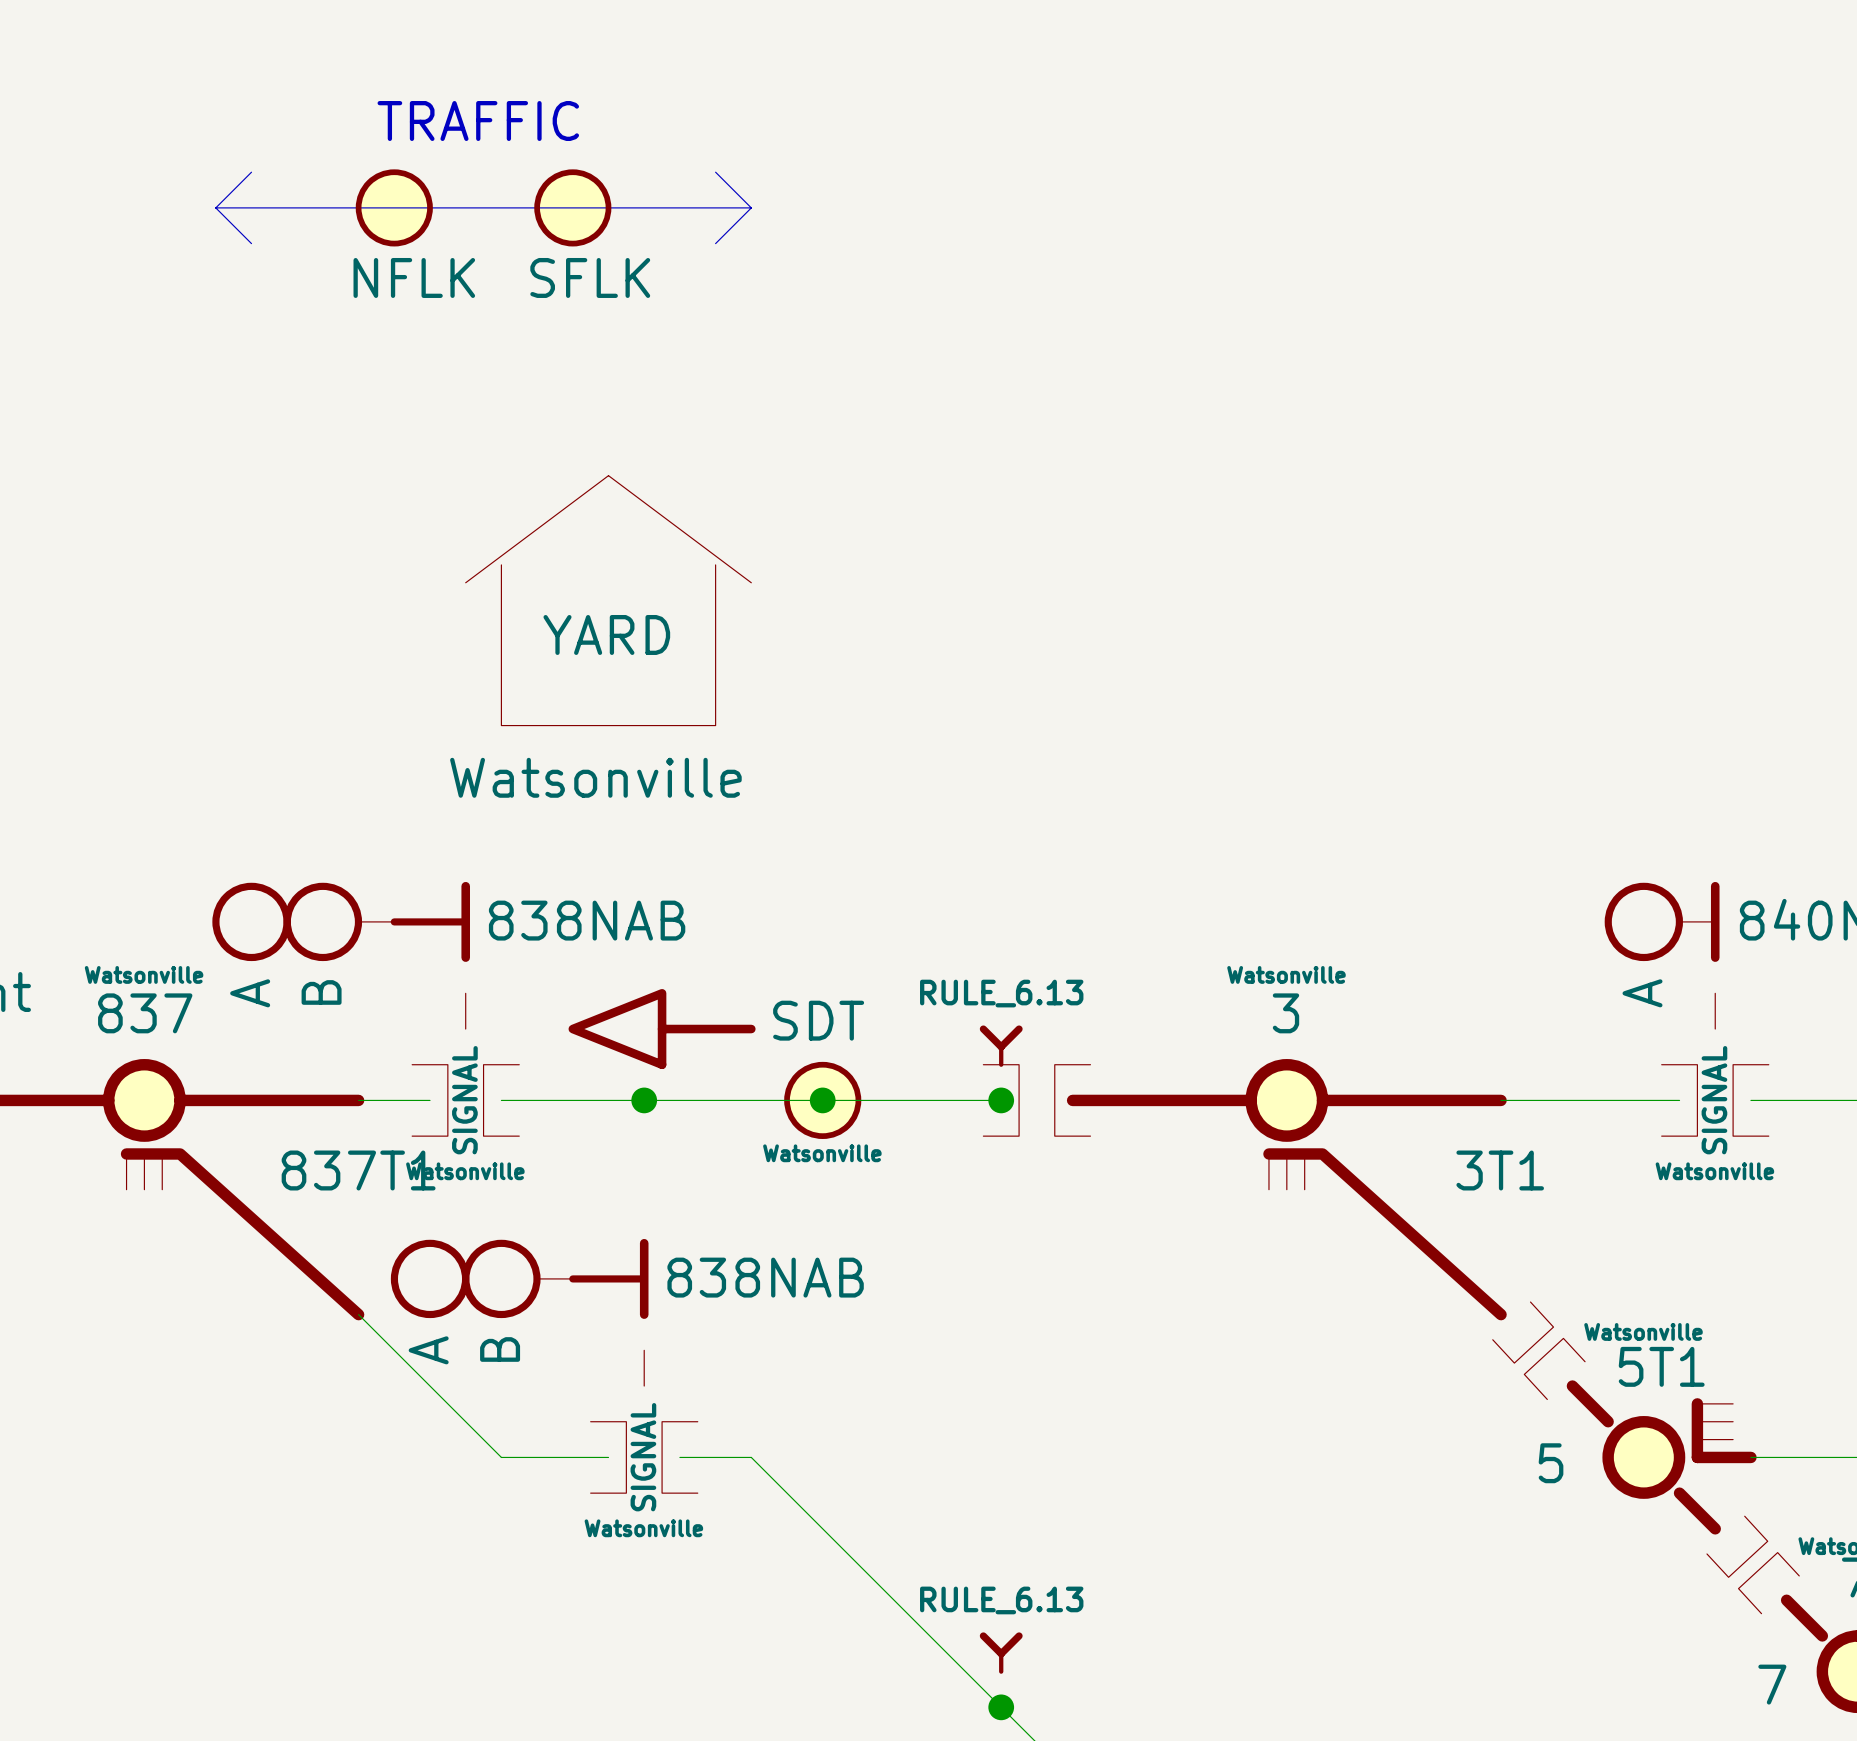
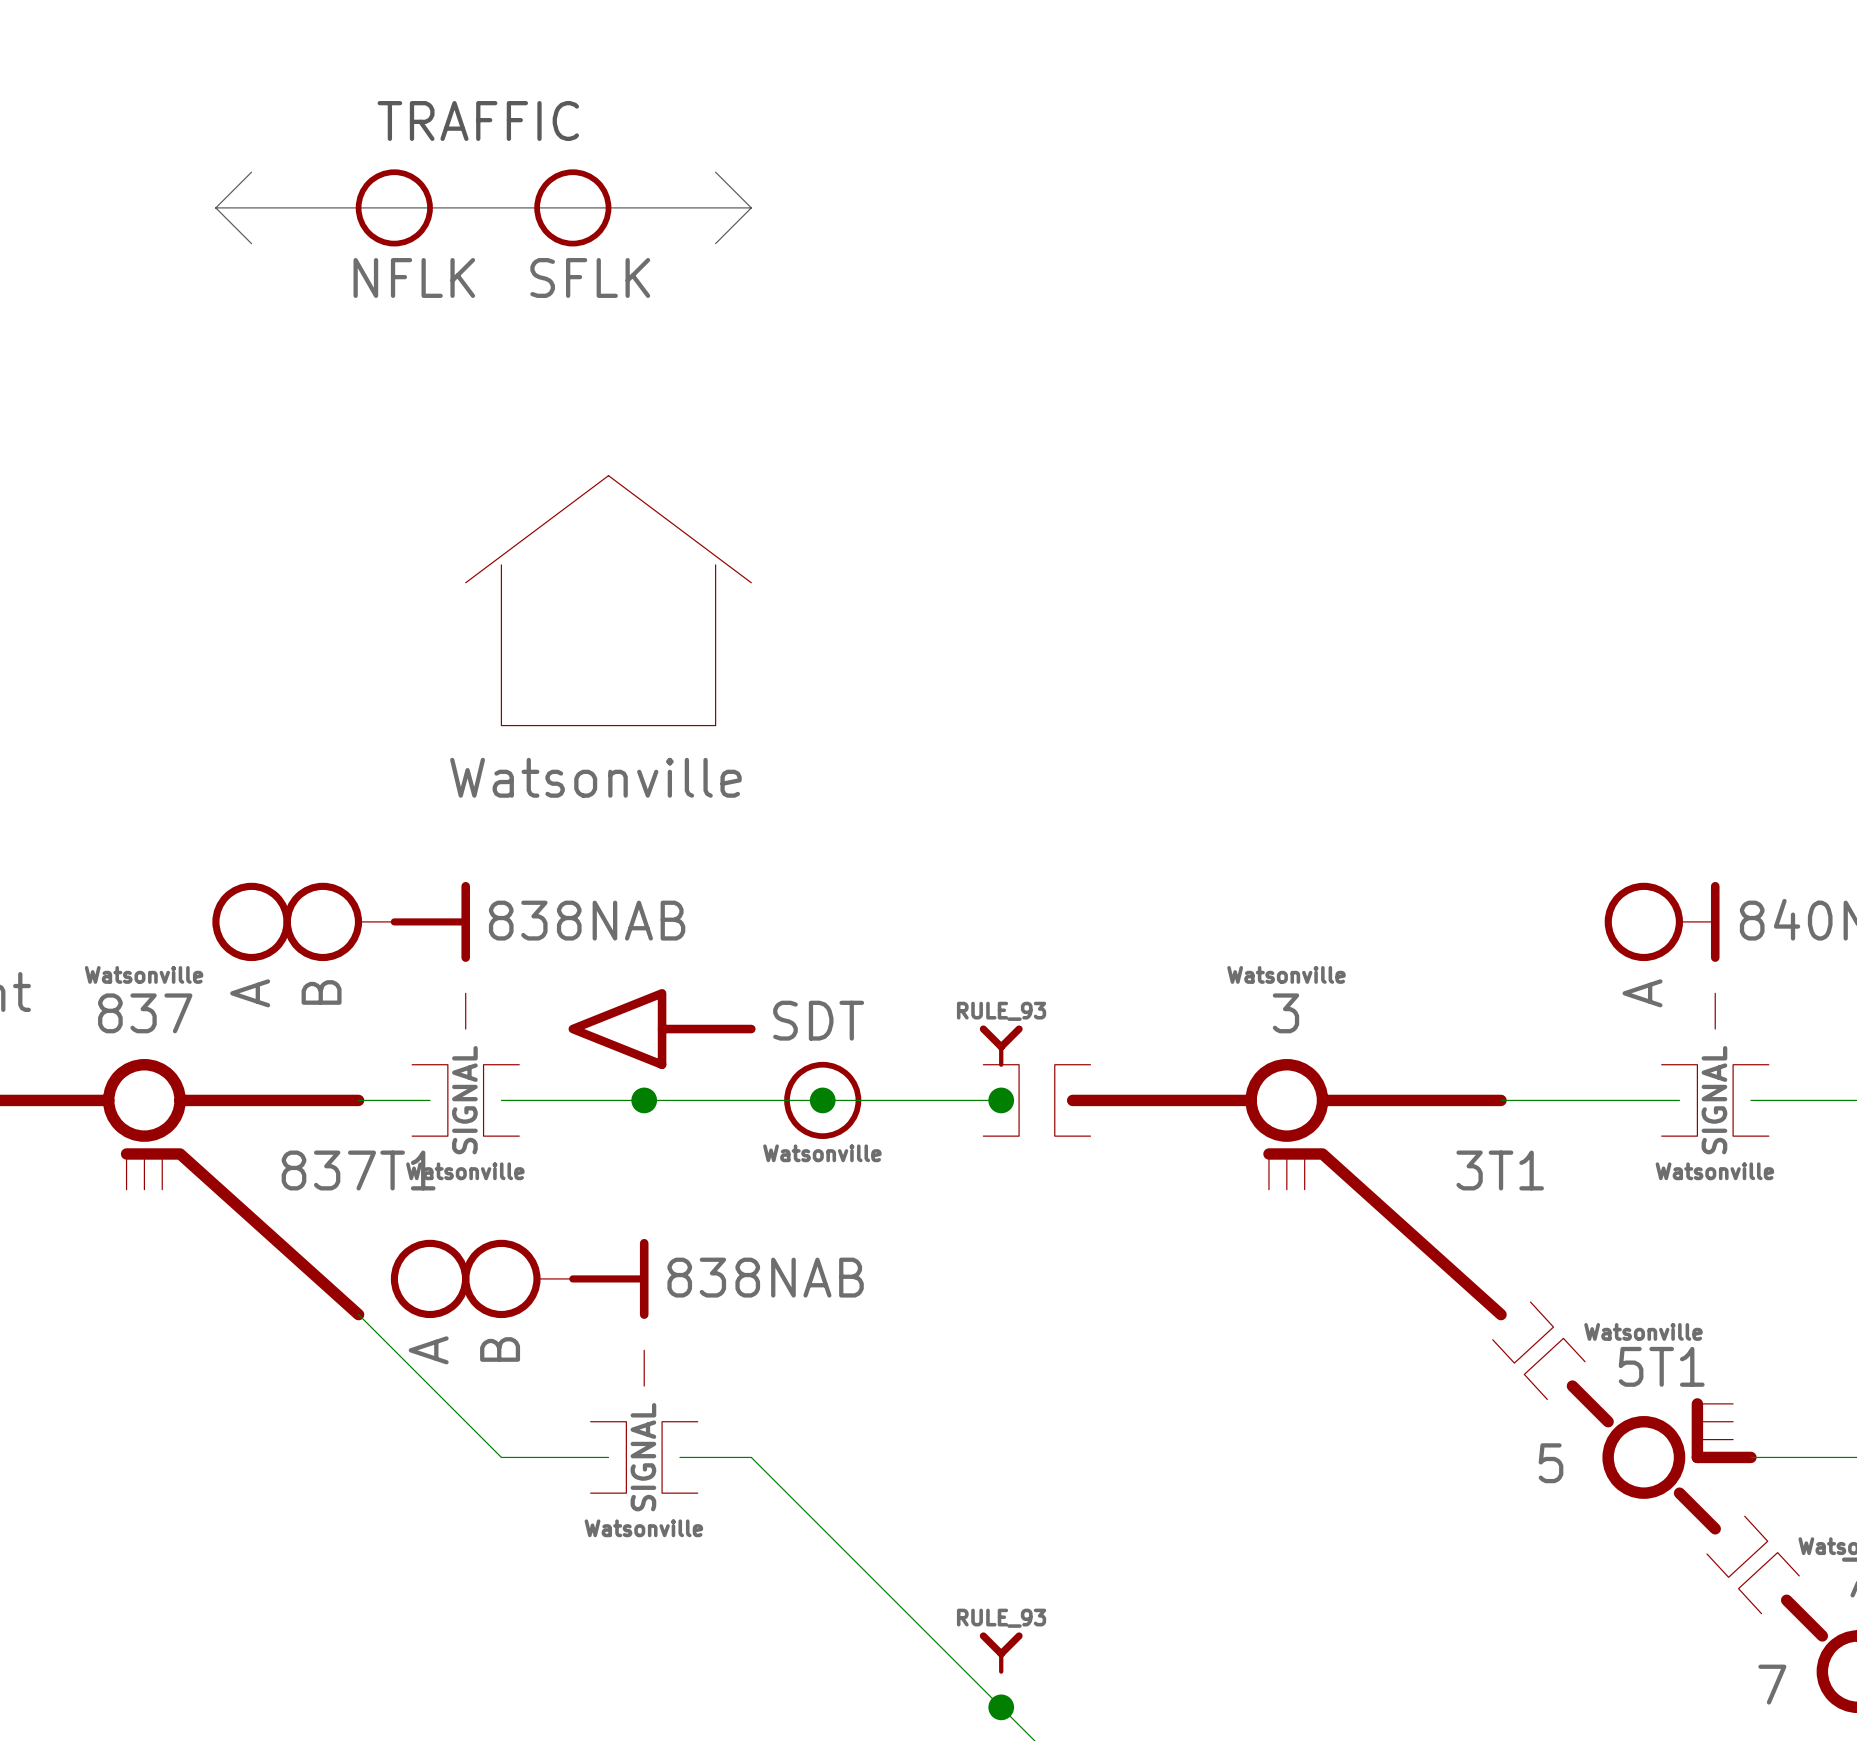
part text: YARD (606, 634) -> none
part text: RULE_6.13 (1001, 993) -> RULE_93 (1001, 1011)
part text: RULE_6.13 (1001, 1600) -> RULE_93 (1001, 1618)

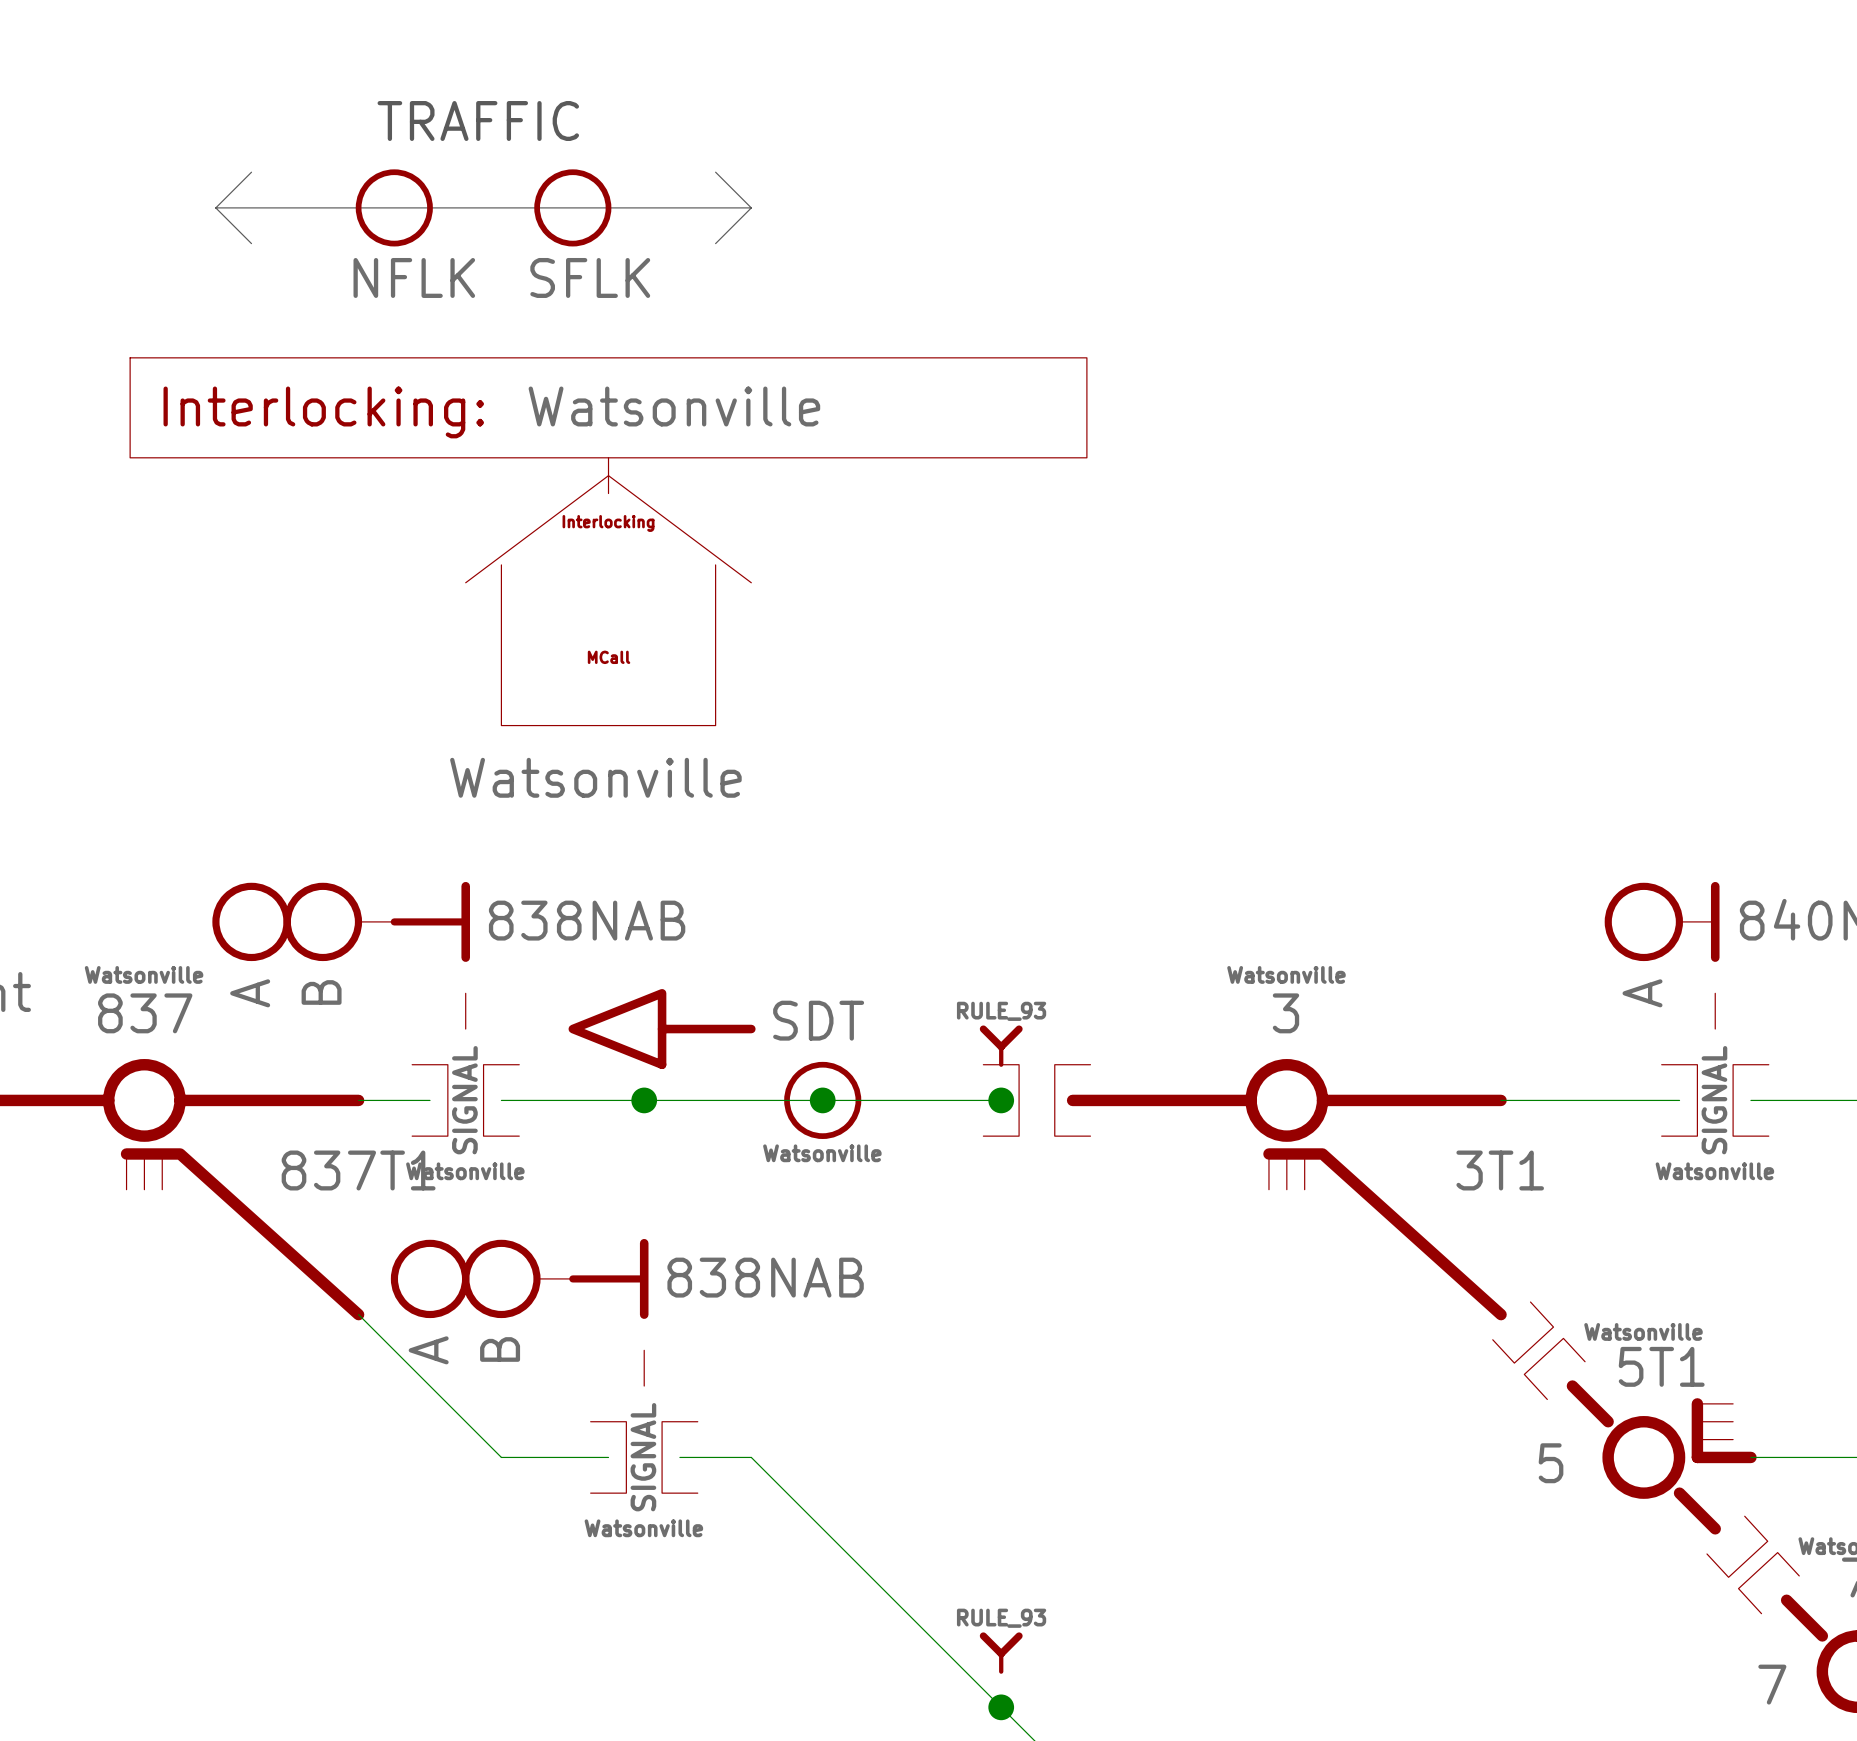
part: none -> Watsonville (608, 425)
part text: none -> Interlocking (608, 523)
part text: none -> MCall (609, 657)

